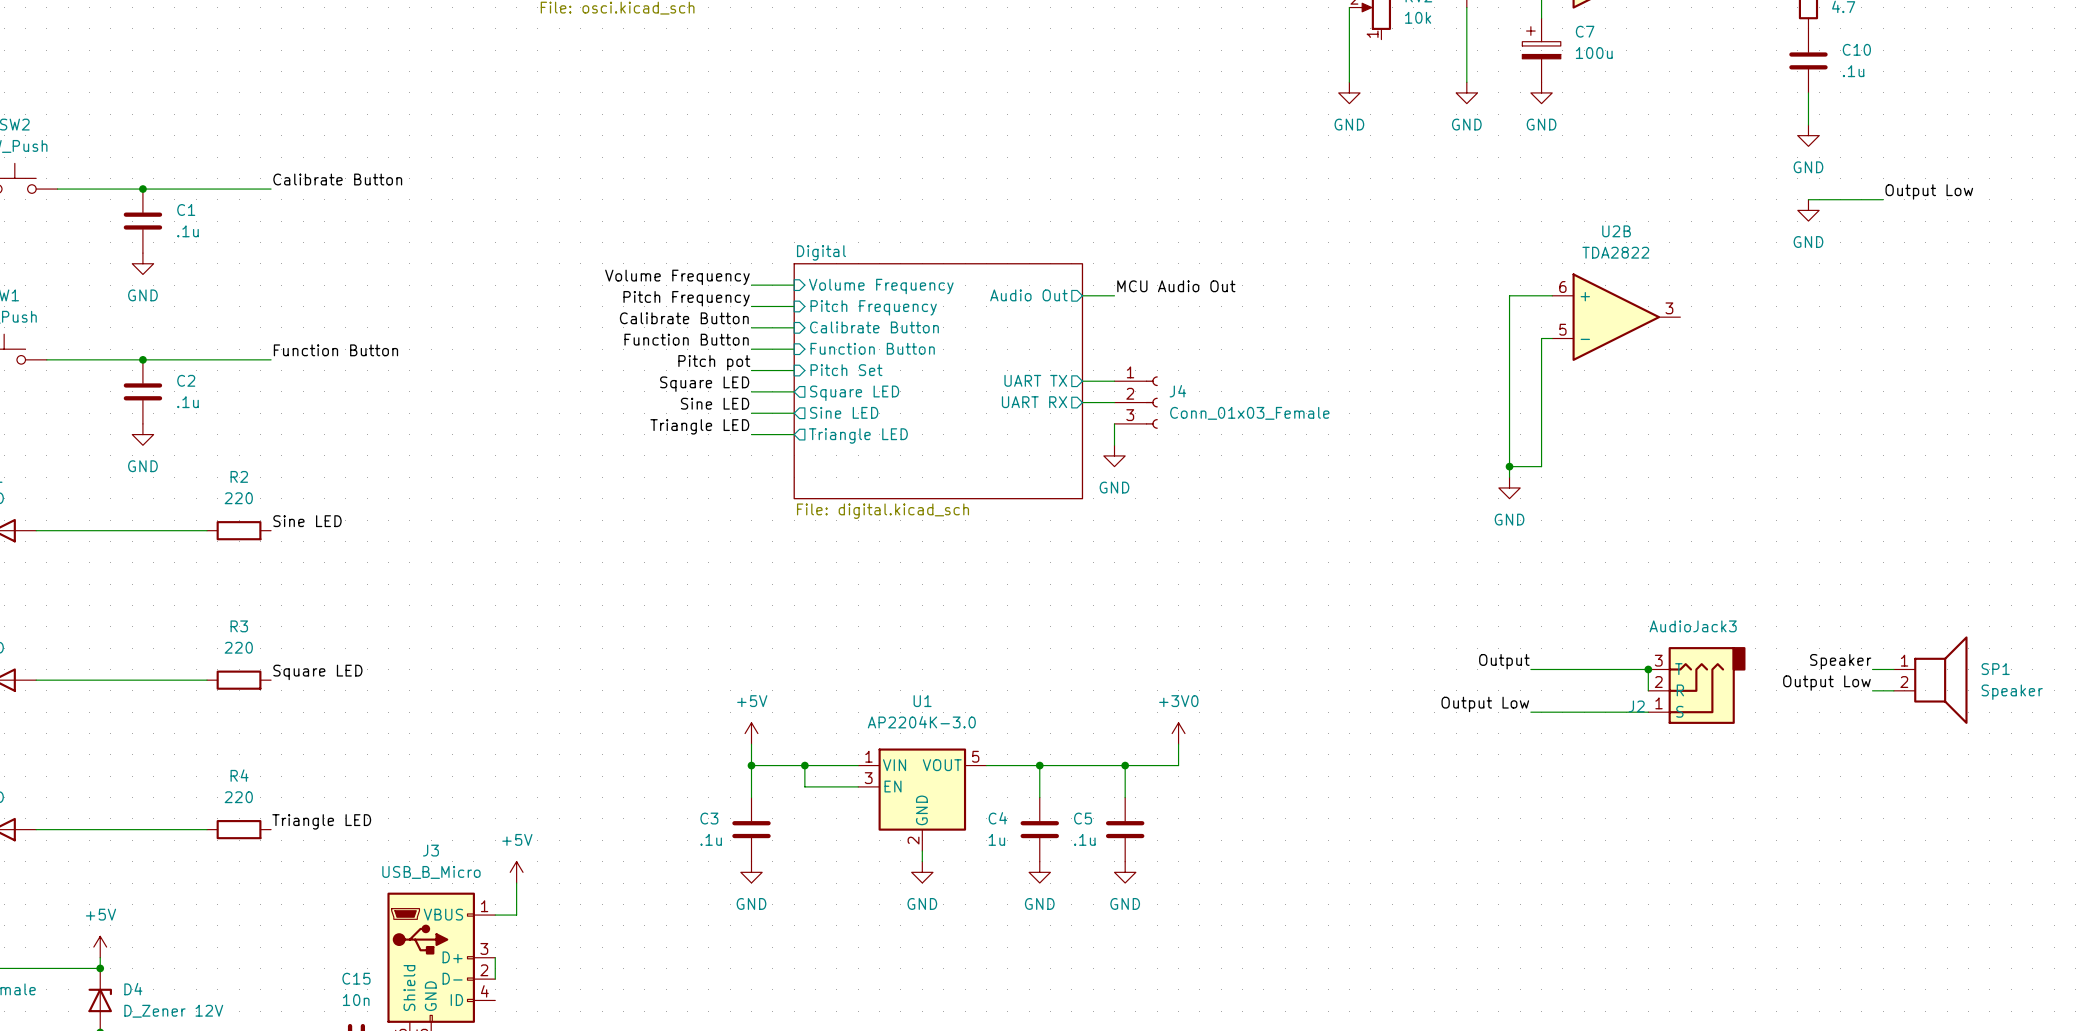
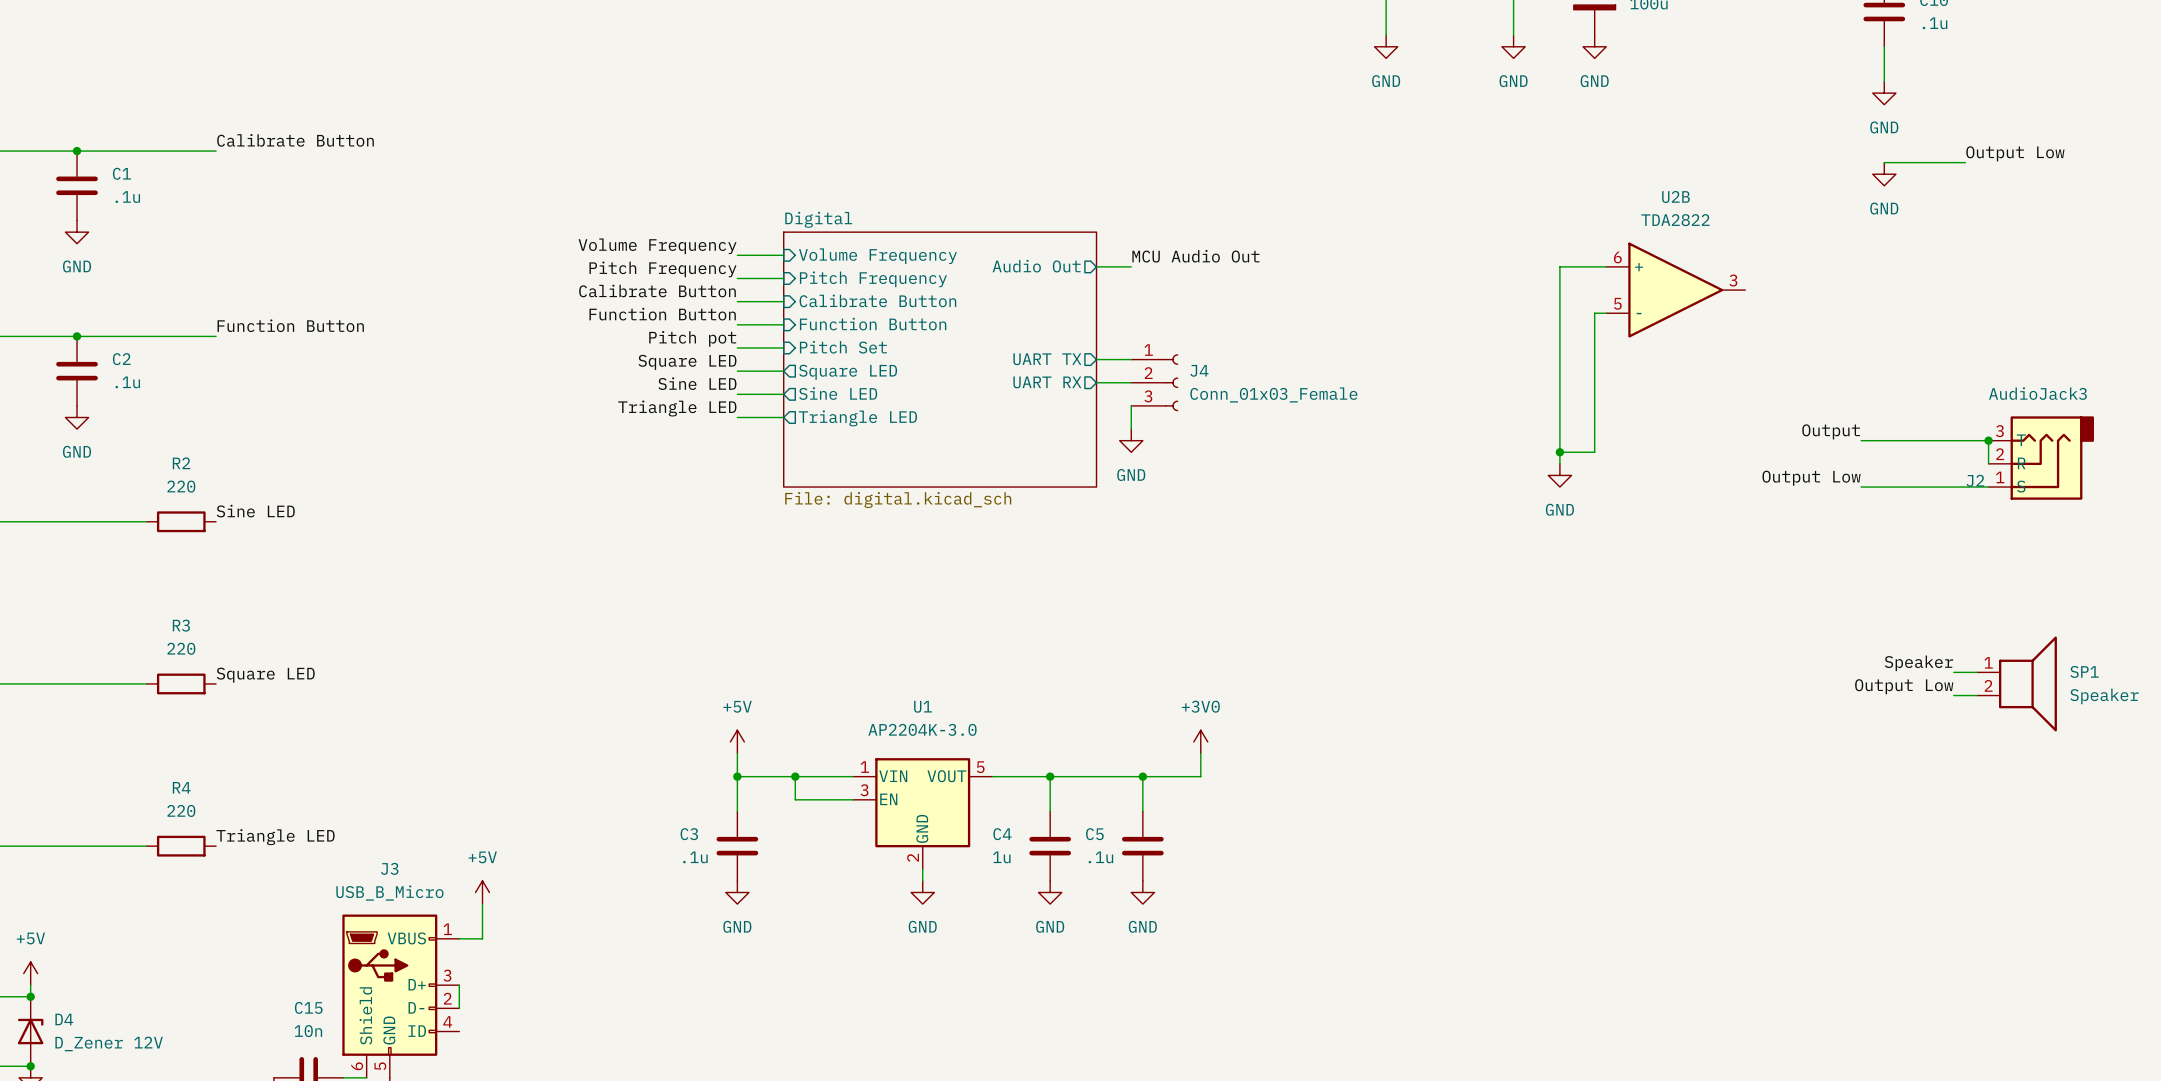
label: none -> Output (1831, 431)
wire: none -> (1861, 440) (1988, 440) (1988, 463)
junction: none -> (1988, 440)
label: none -> Output Low (1811, 478)
wire: none -> (1861, 487) (1988, 487)
label: Output (1504, 661) -> none
wire: (1530, 669) (1648, 669) (1648, 690) -> none
junction: (1648, 669) -> none
J2 position: (1696, 685) -> (2041, 458)
label: Output Low (1485, 704) -> none
wire: (1530, 712) (1648, 712) -> none

